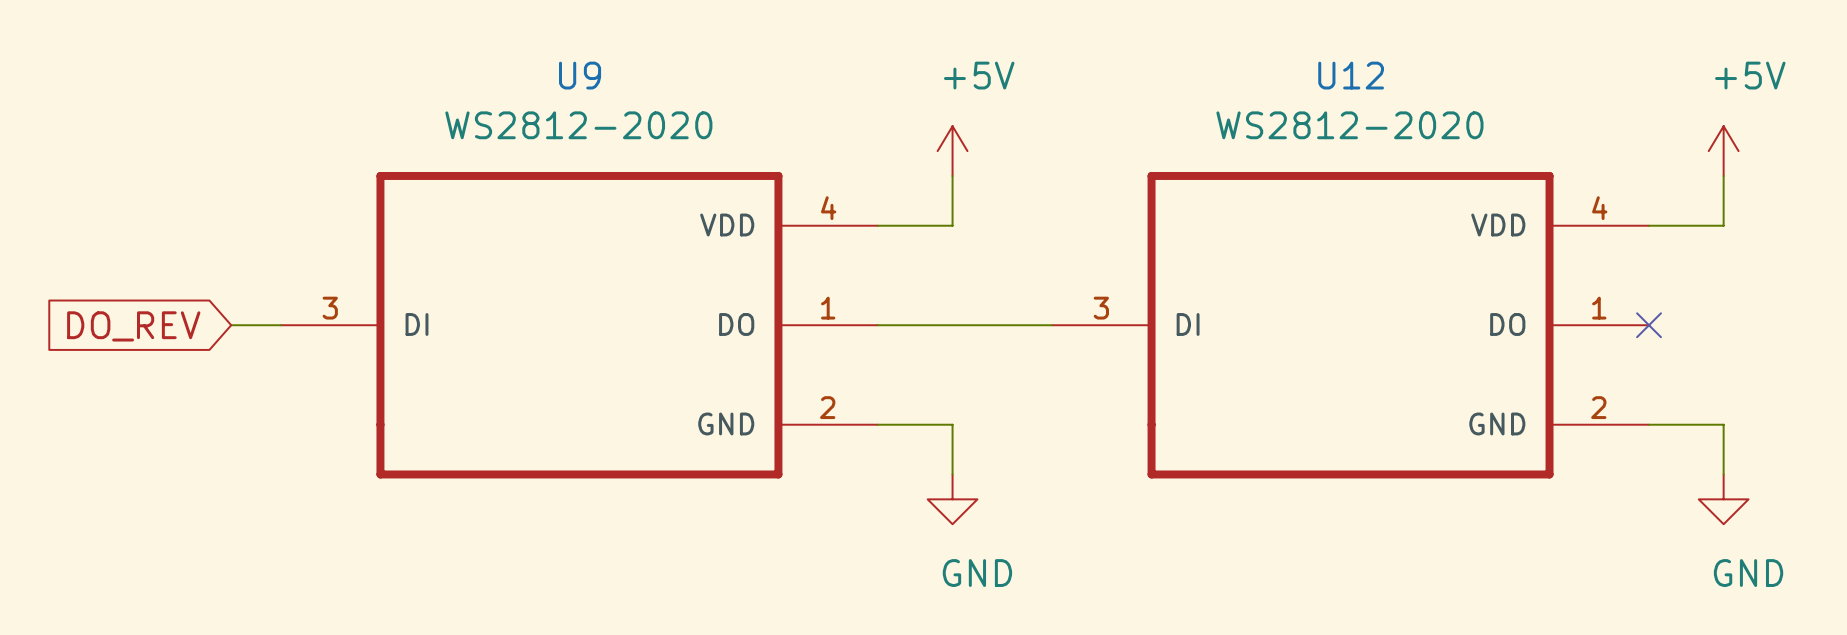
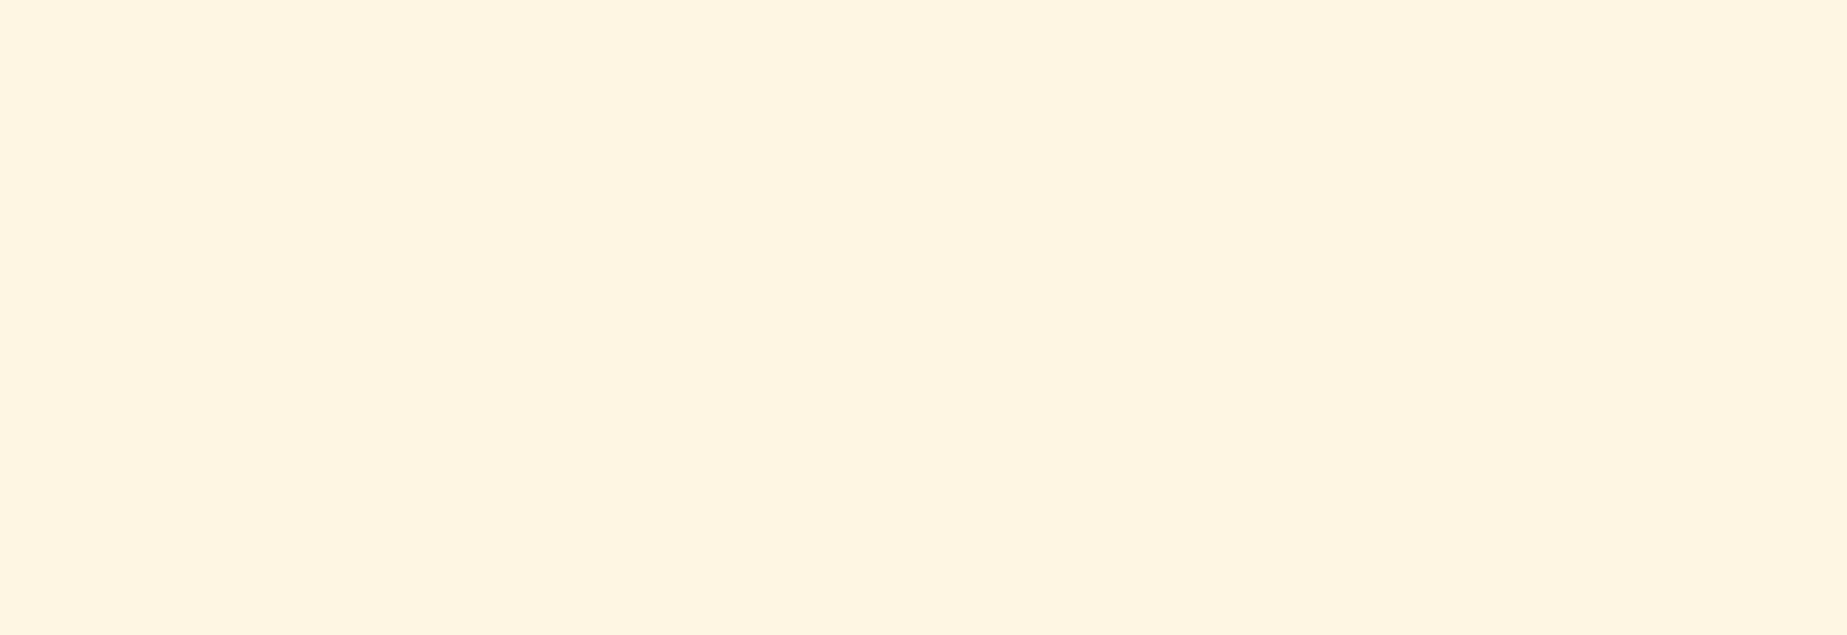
power symbol: +5V (952, 151) -> none
power symbol: +5V (1723, 151) -> none
wire: (952, 175) (952, 225) (877, 225) -> none
wire: (1723, 175) (1723, 225) (1649, 225) -> none
wire: (231, 325) (280, 325) -> none
U9: WS2812-2020 (579, 325) -> none
wire: (877, 325) (1052, 325) -> none
U12: WS2812-2020 (1350, 325) -> none
no-connect mark: (1649, 325) -> none
global label: DO_REV (133, 326) -> none
wire: (877, 424) (952, 424) (952, 474) -> none
wire: (1649, 424) (1723, 424) (1723, 474) -> none
power symbol: GND (952, 499) -> none
power symbol: GND (1723, 499) -> none

